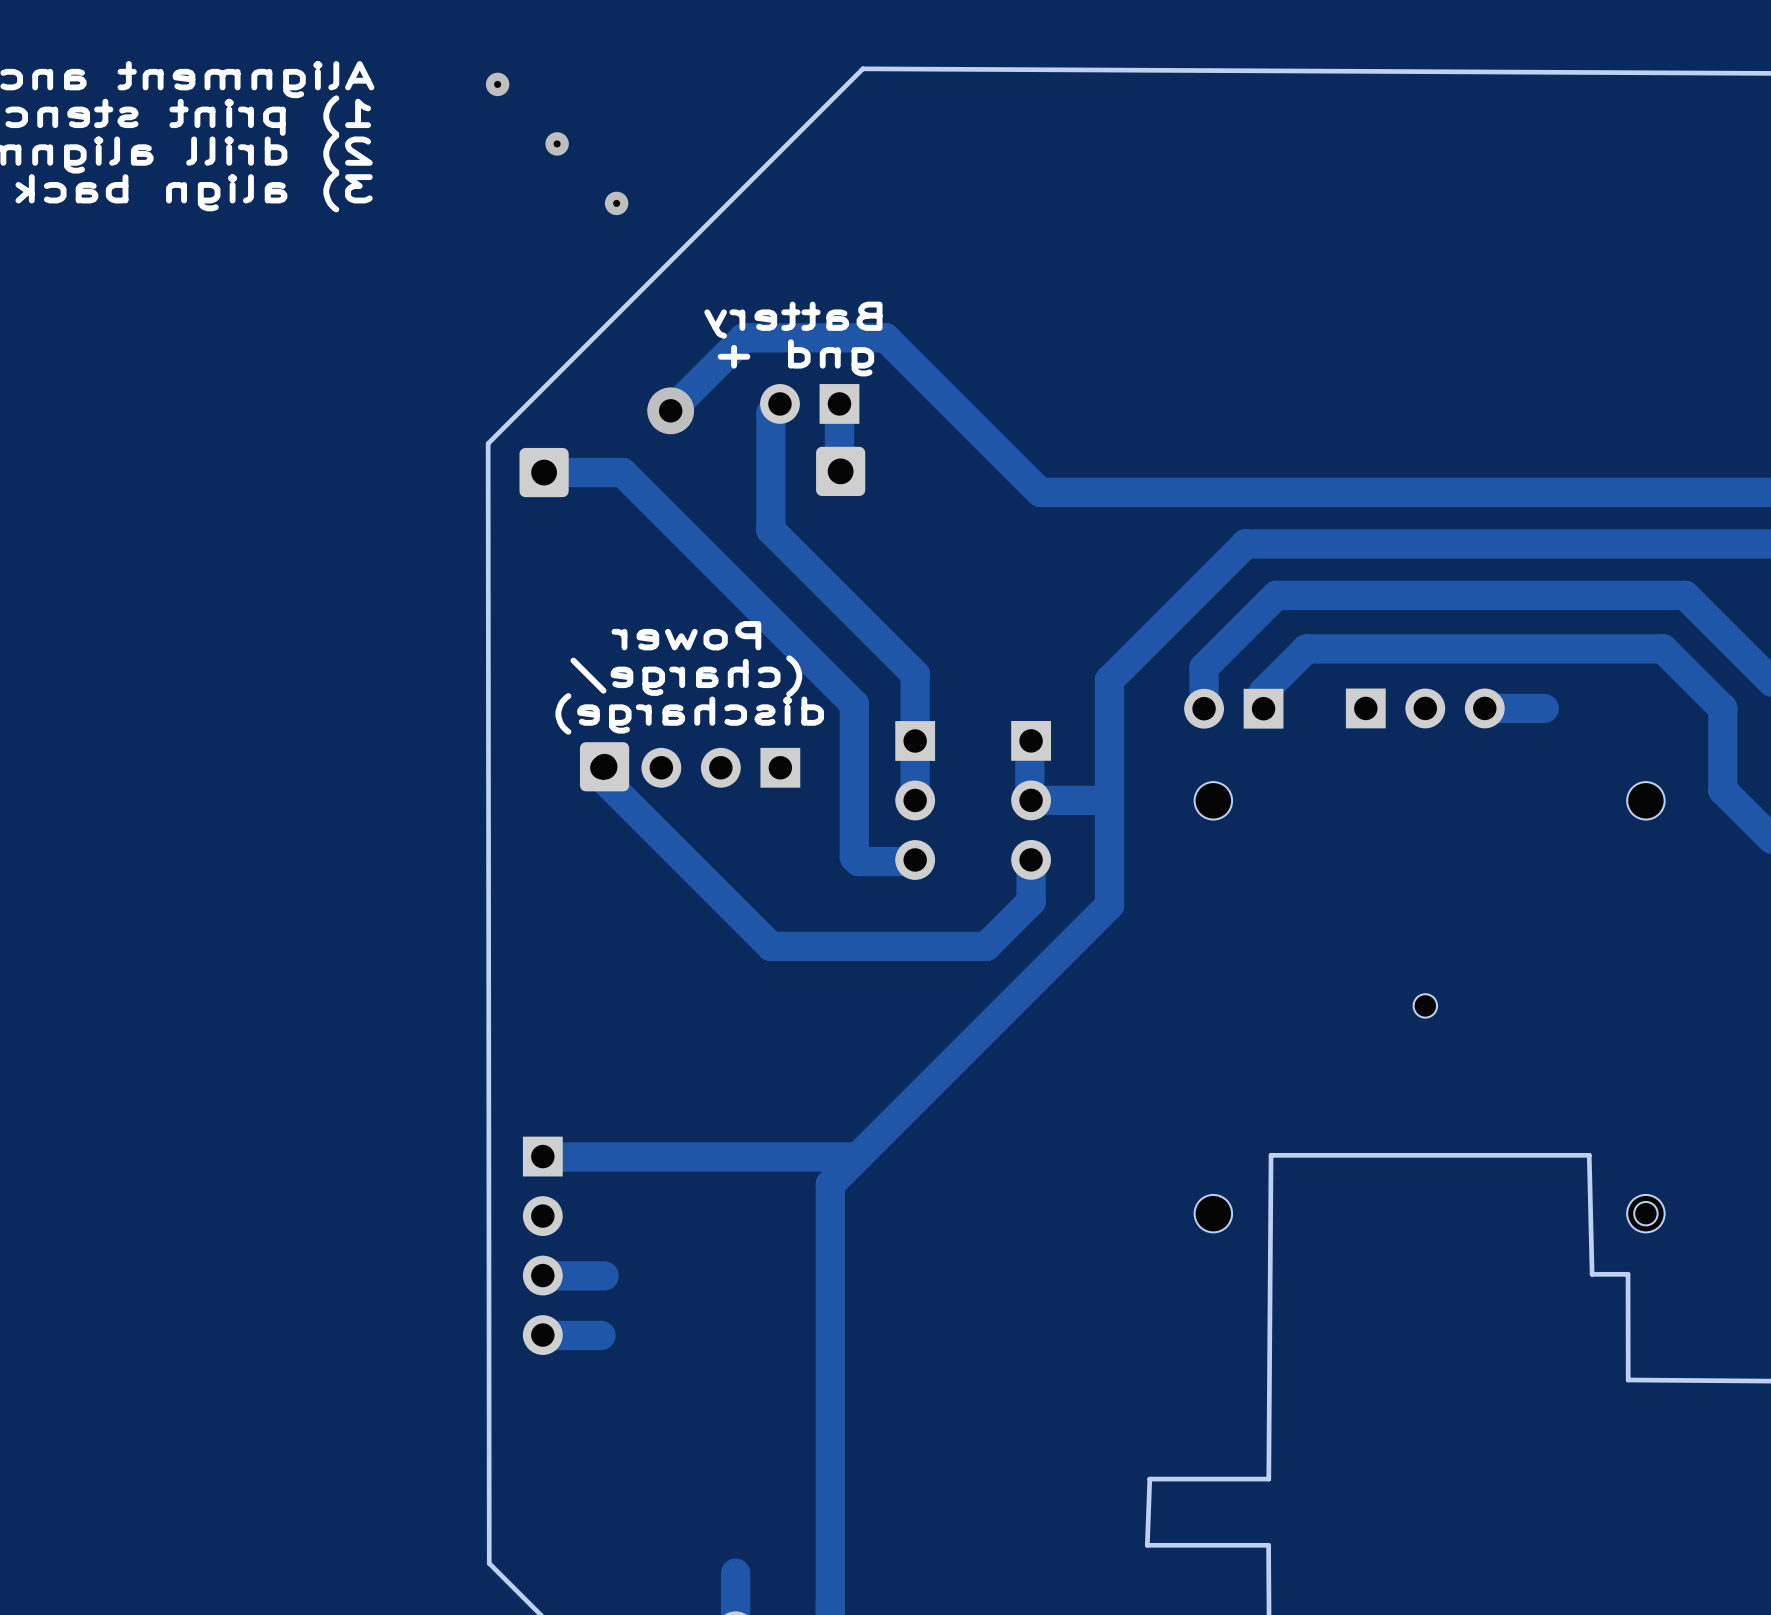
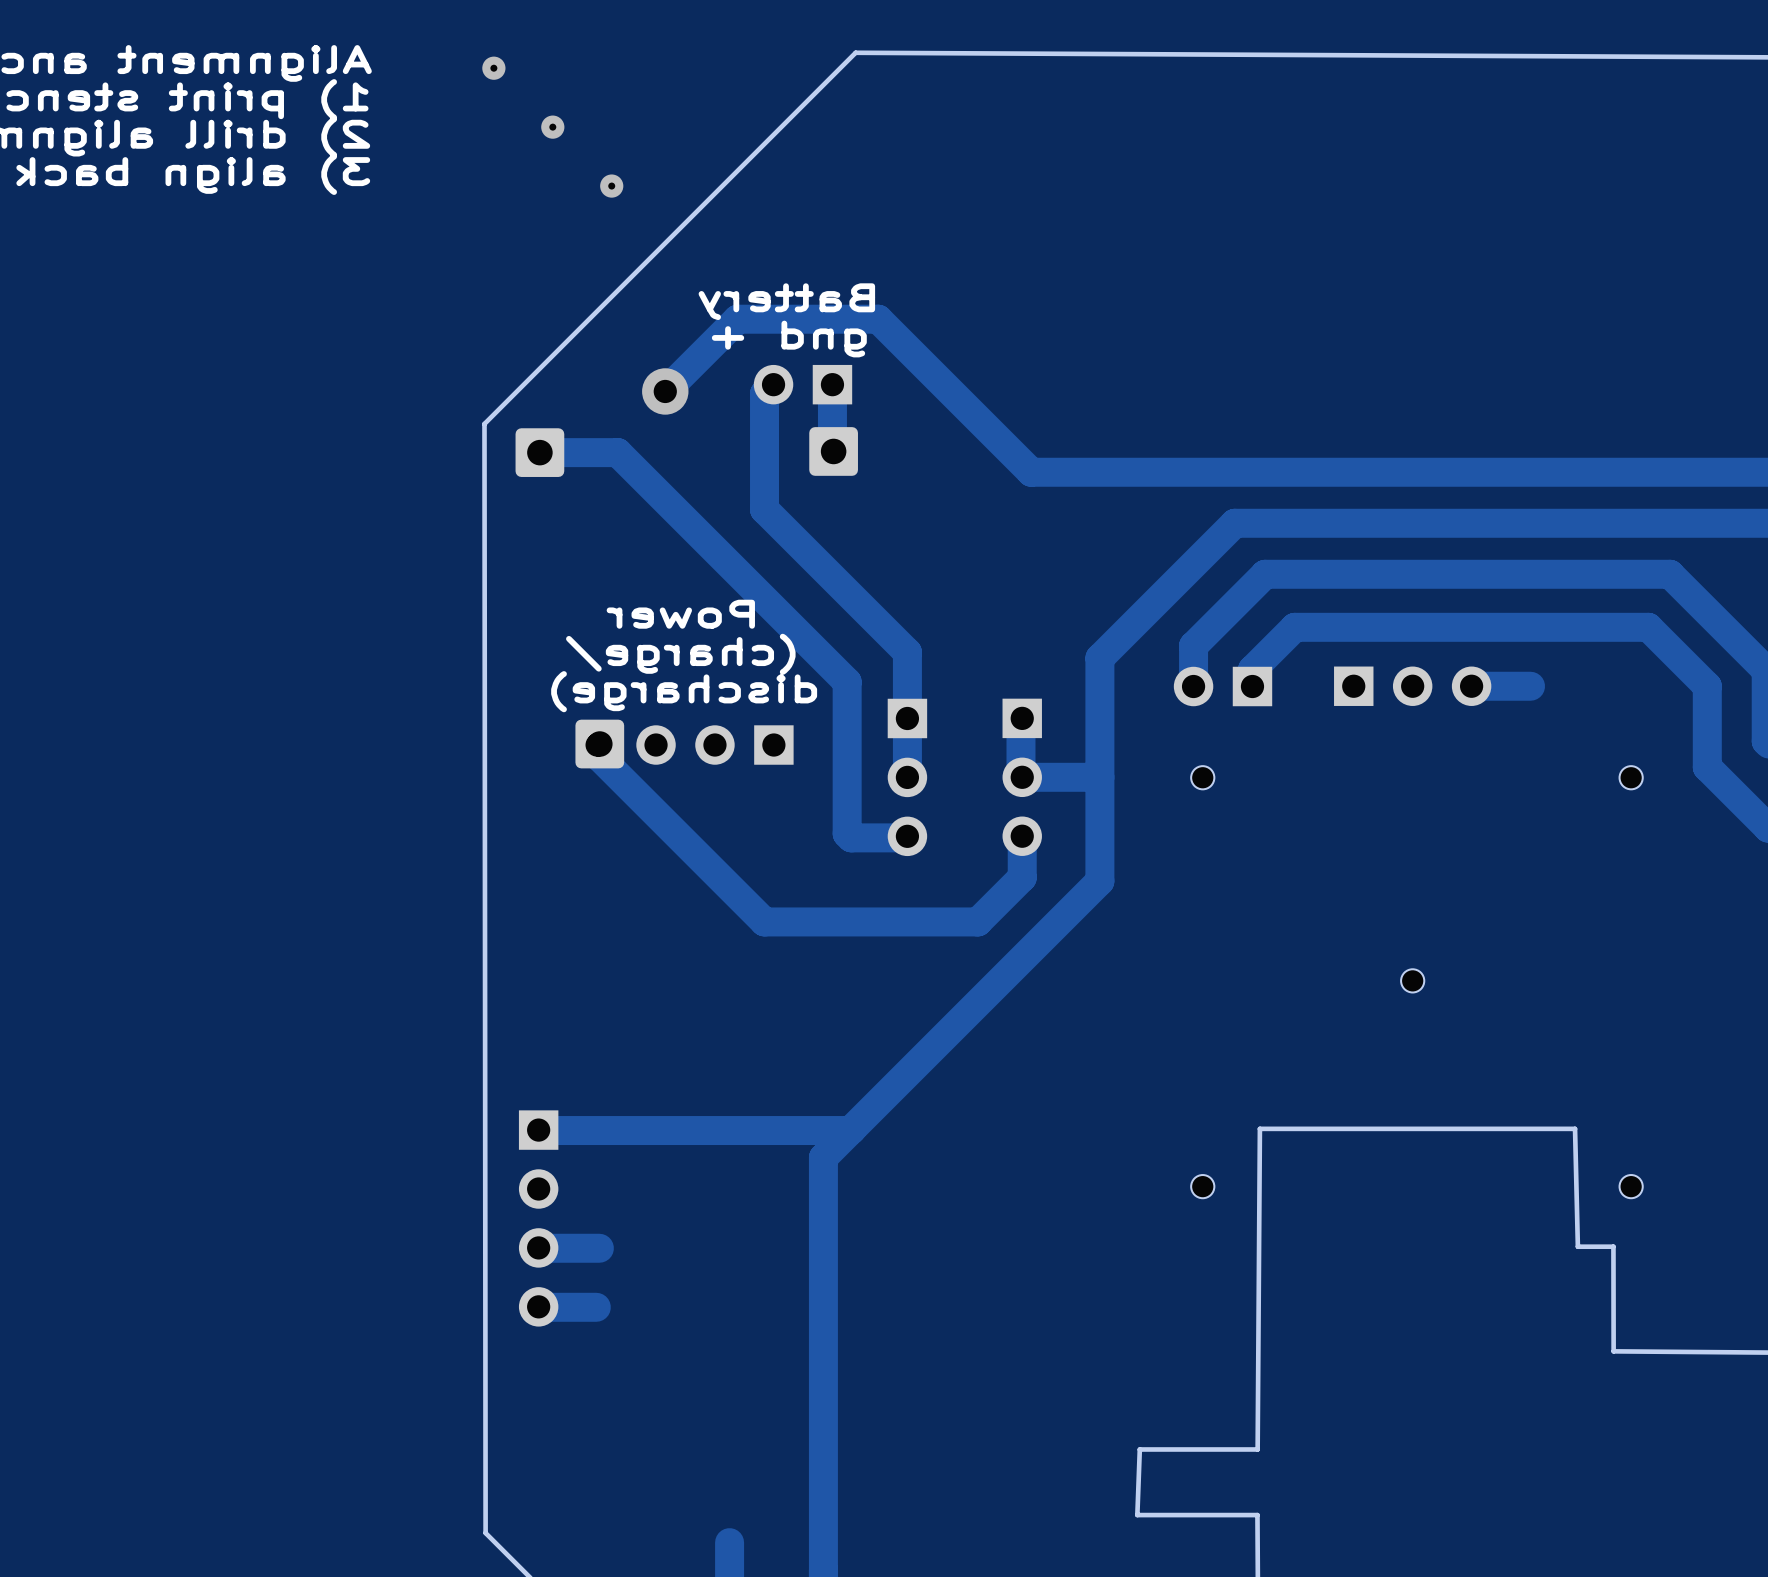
part footprint: [1194, 782, 1233, 820] -> [1191, 766, 1215, 790]
part footprint: [1627, 782, 1665, 820] -> [1619, 766, 1643, 790]
part footprint: [1194, 1194, 1233, 1233] -> [1191, 1175, 1215, 1199]
part footprint: [1627, 1194, 1665, 1233] -> [1619, 1175, 1643, 1199]

